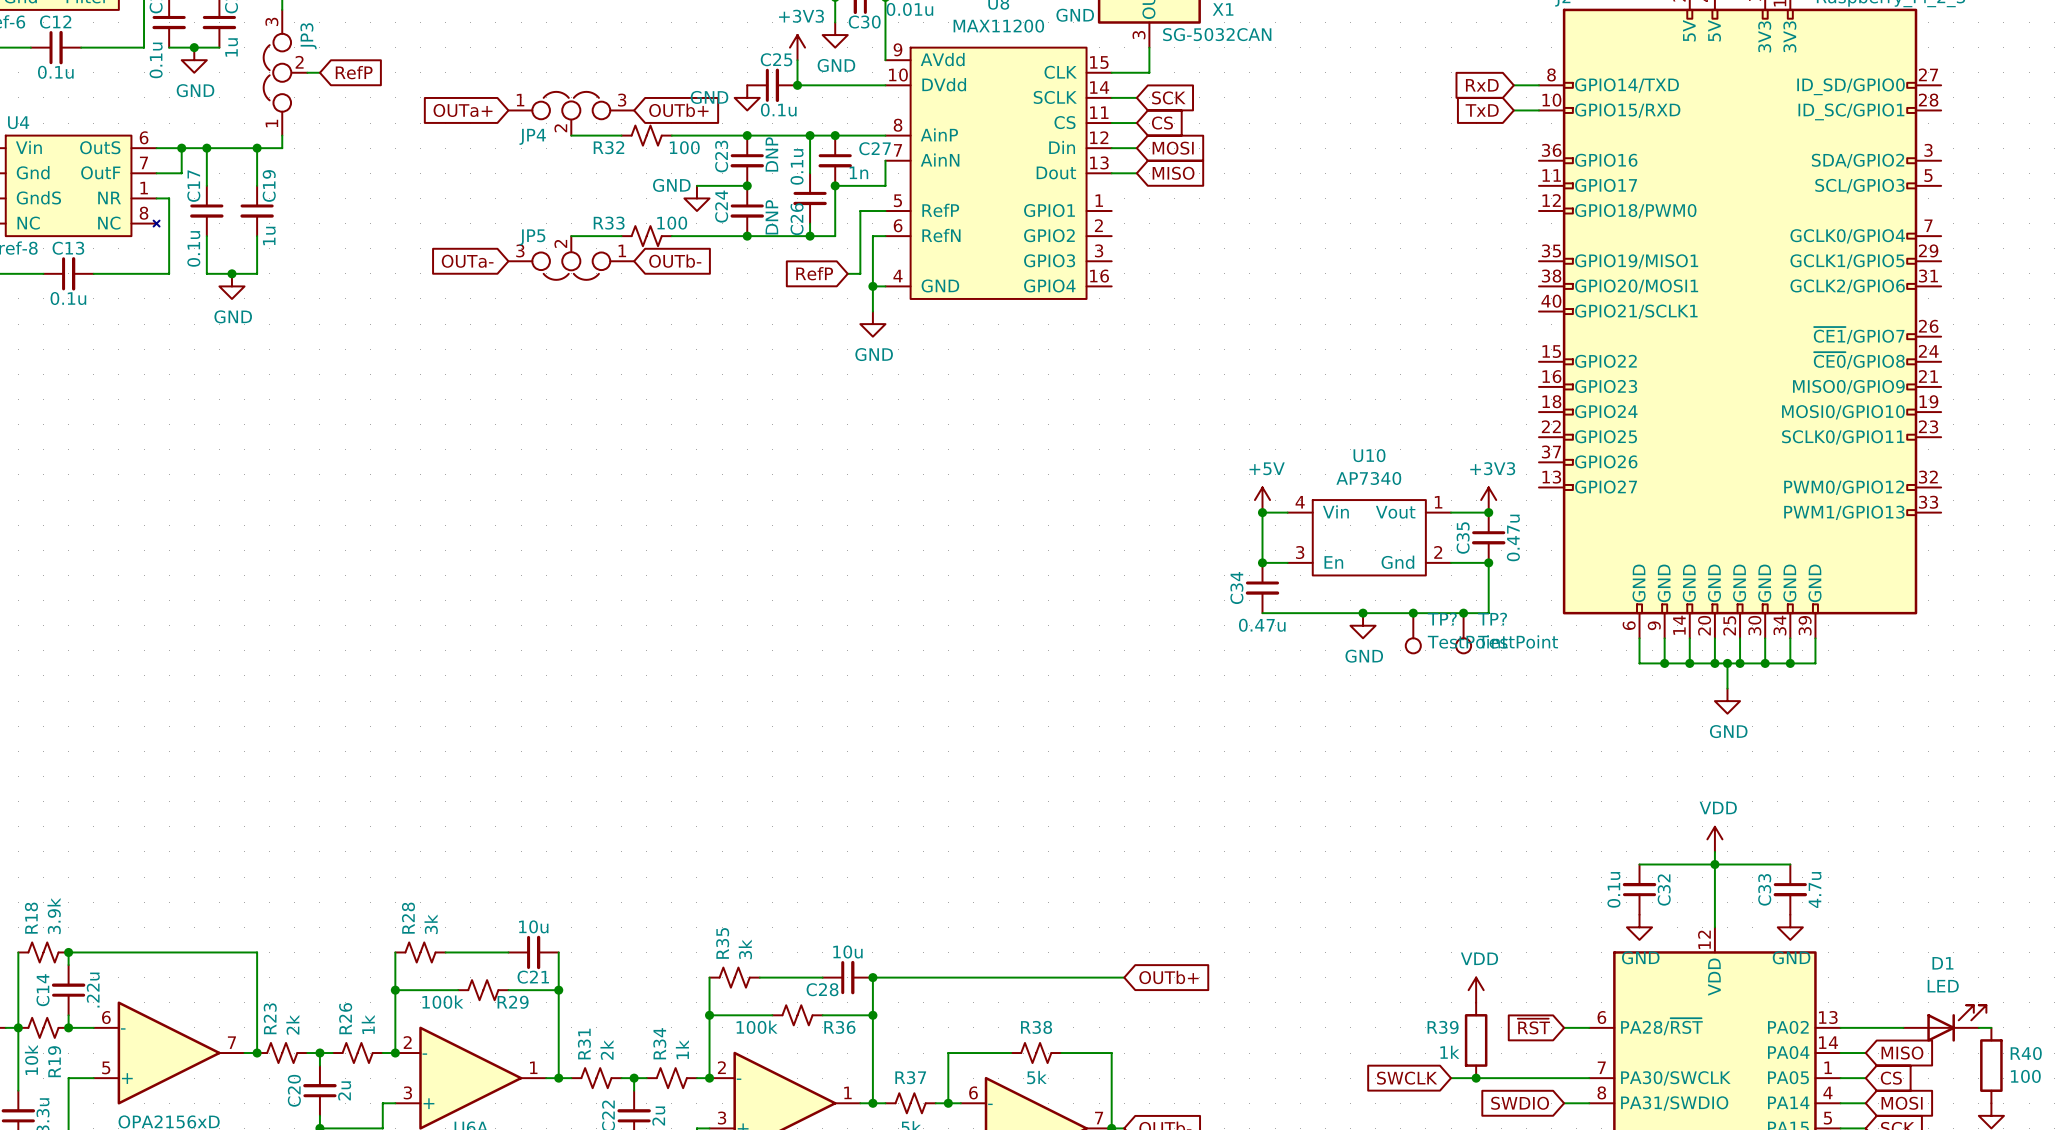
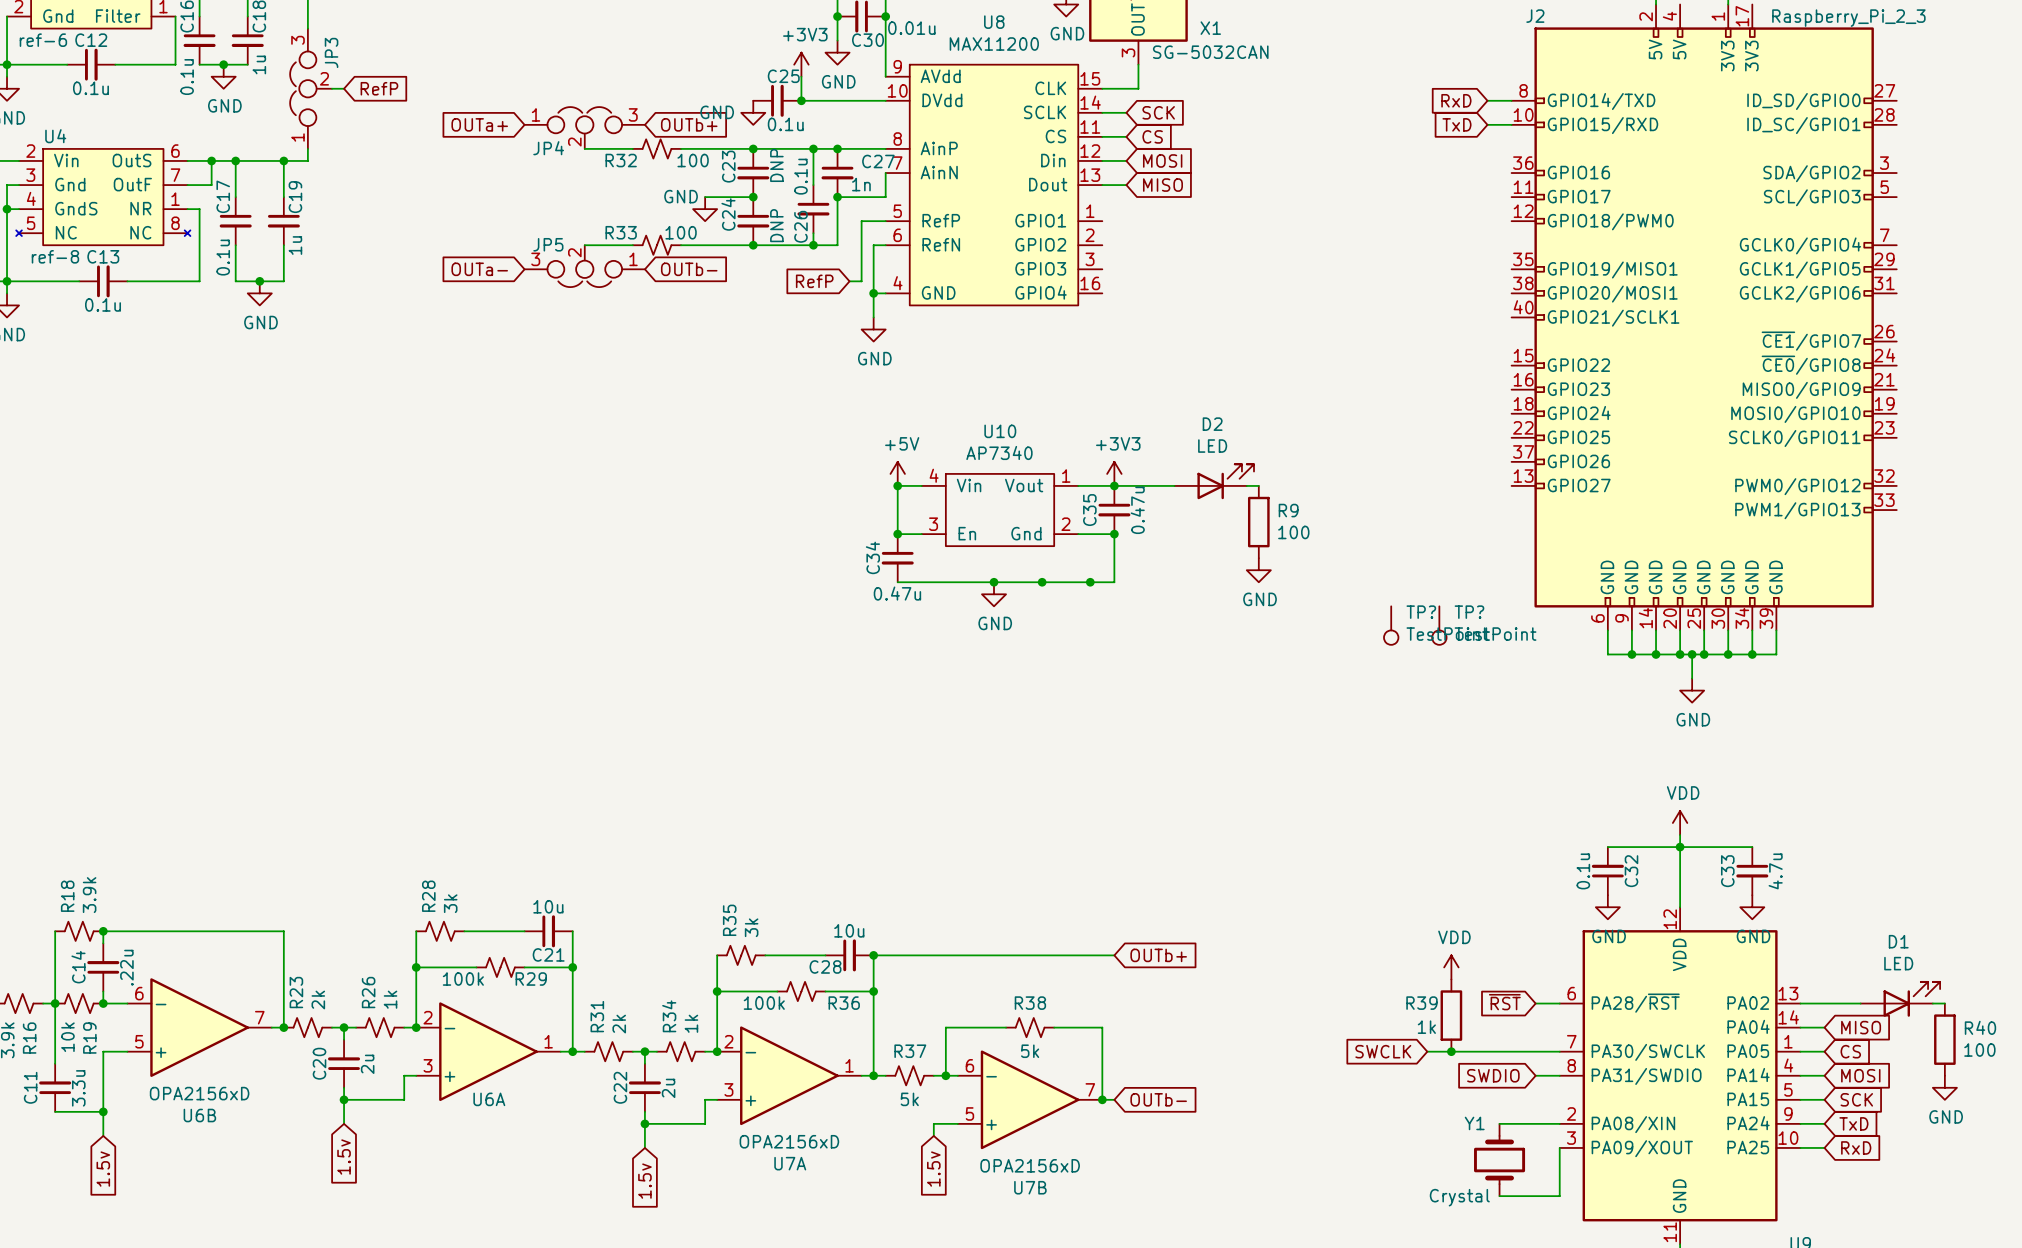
power symbol: none -> +5V (897, 473)
power symbol: none -> +3V3 (1114, 473)
D2: none -> LED (1214, 481)
junction: none -> (897, 485)
wire: none -> (921, 485) (897, 485) (897, 534) (921, 534)
wire: none -> (1078, 485) (1174, 485)
junction: none -> (1114, 485)
wire: none -> (1246, 485) (1258, 485)
power symbol: +5V (1262, 500) -> none
power symbol: +3V3 (1488, 500) -> none
junction: (1262, 512) -> none
wire: (1287, 512) (1262, 512) (1262, 562) (1287, 562) -> none
wire: (1451, 512) (1488, 512) -> none
junction: (1488, 512) -> none
R9: none -> 100 (1258, 522)
junction: none -> (897, 534)
wire: none -> (1078, 534) (1114, 534) (1114, 582) (897, 582)
junction: none -> (1114, 534)
U10 position: (1369, 537) -> (1000, 510)
C35 position: (1488, 537) -> (1114, 510)
junction: (1262, 562) -> none
wire: (1451, 562) (1488, 562) (1488, 613) (1262, 613) -> none
junction: (1488, 562) -> none
junction: none -> (994, 582)
junction: none -> (1042, 582)
junction: none -> (1090, 582)
C34 position: (1262, 588) -> (897, 558)
power symbol: none -> GND (994, 594)
junction: (1363, 613) -> none
junction: (1413, 613) -> none
junction: (1463, 613) -> none
power symbol position: GND (1363, 625) -> GND (1258, 570)

